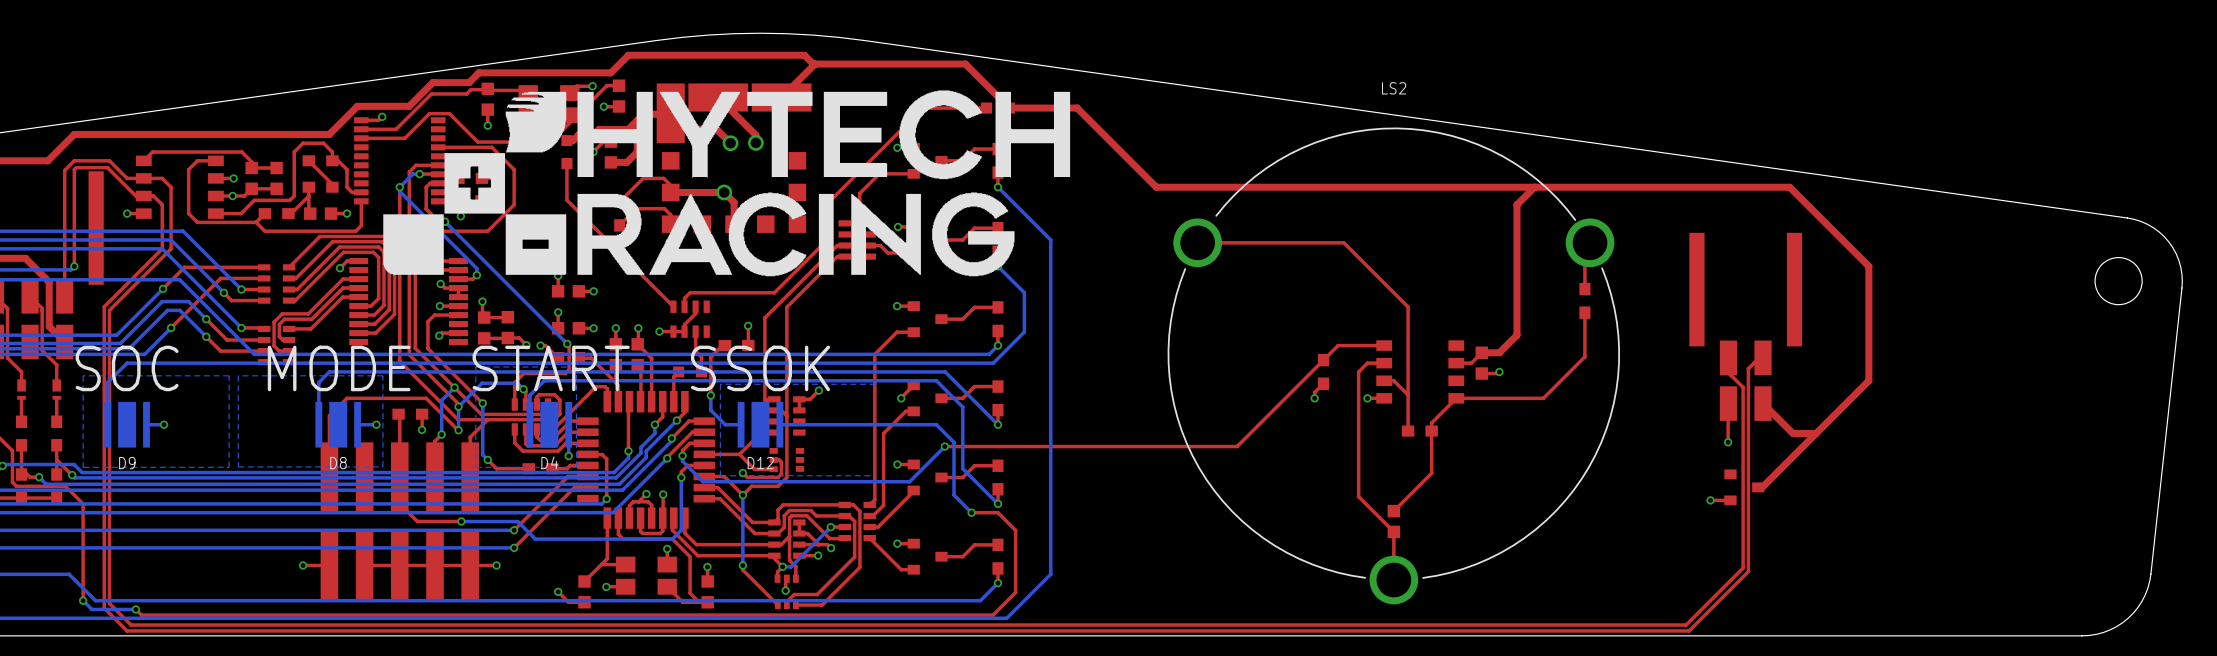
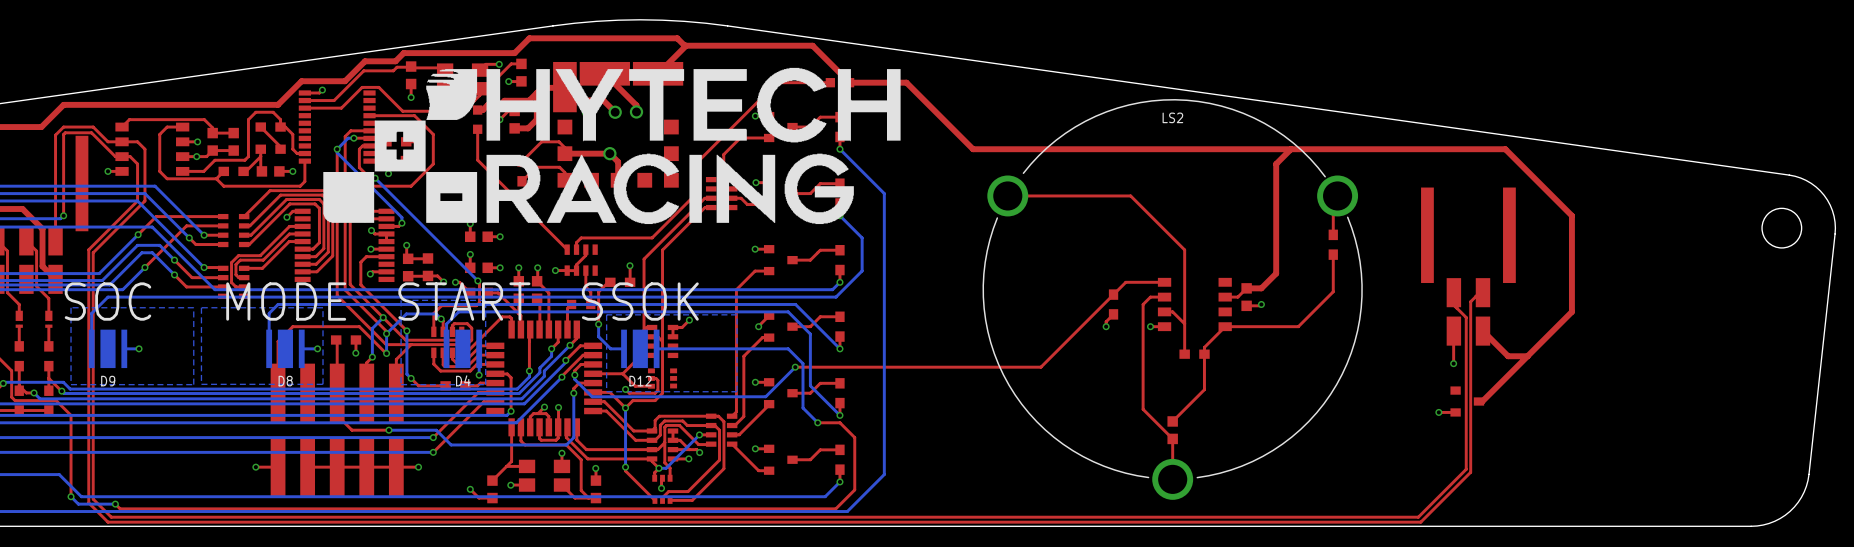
LS2 name position: LS2 (1394, 88) -> LS2 (1172, 117)

